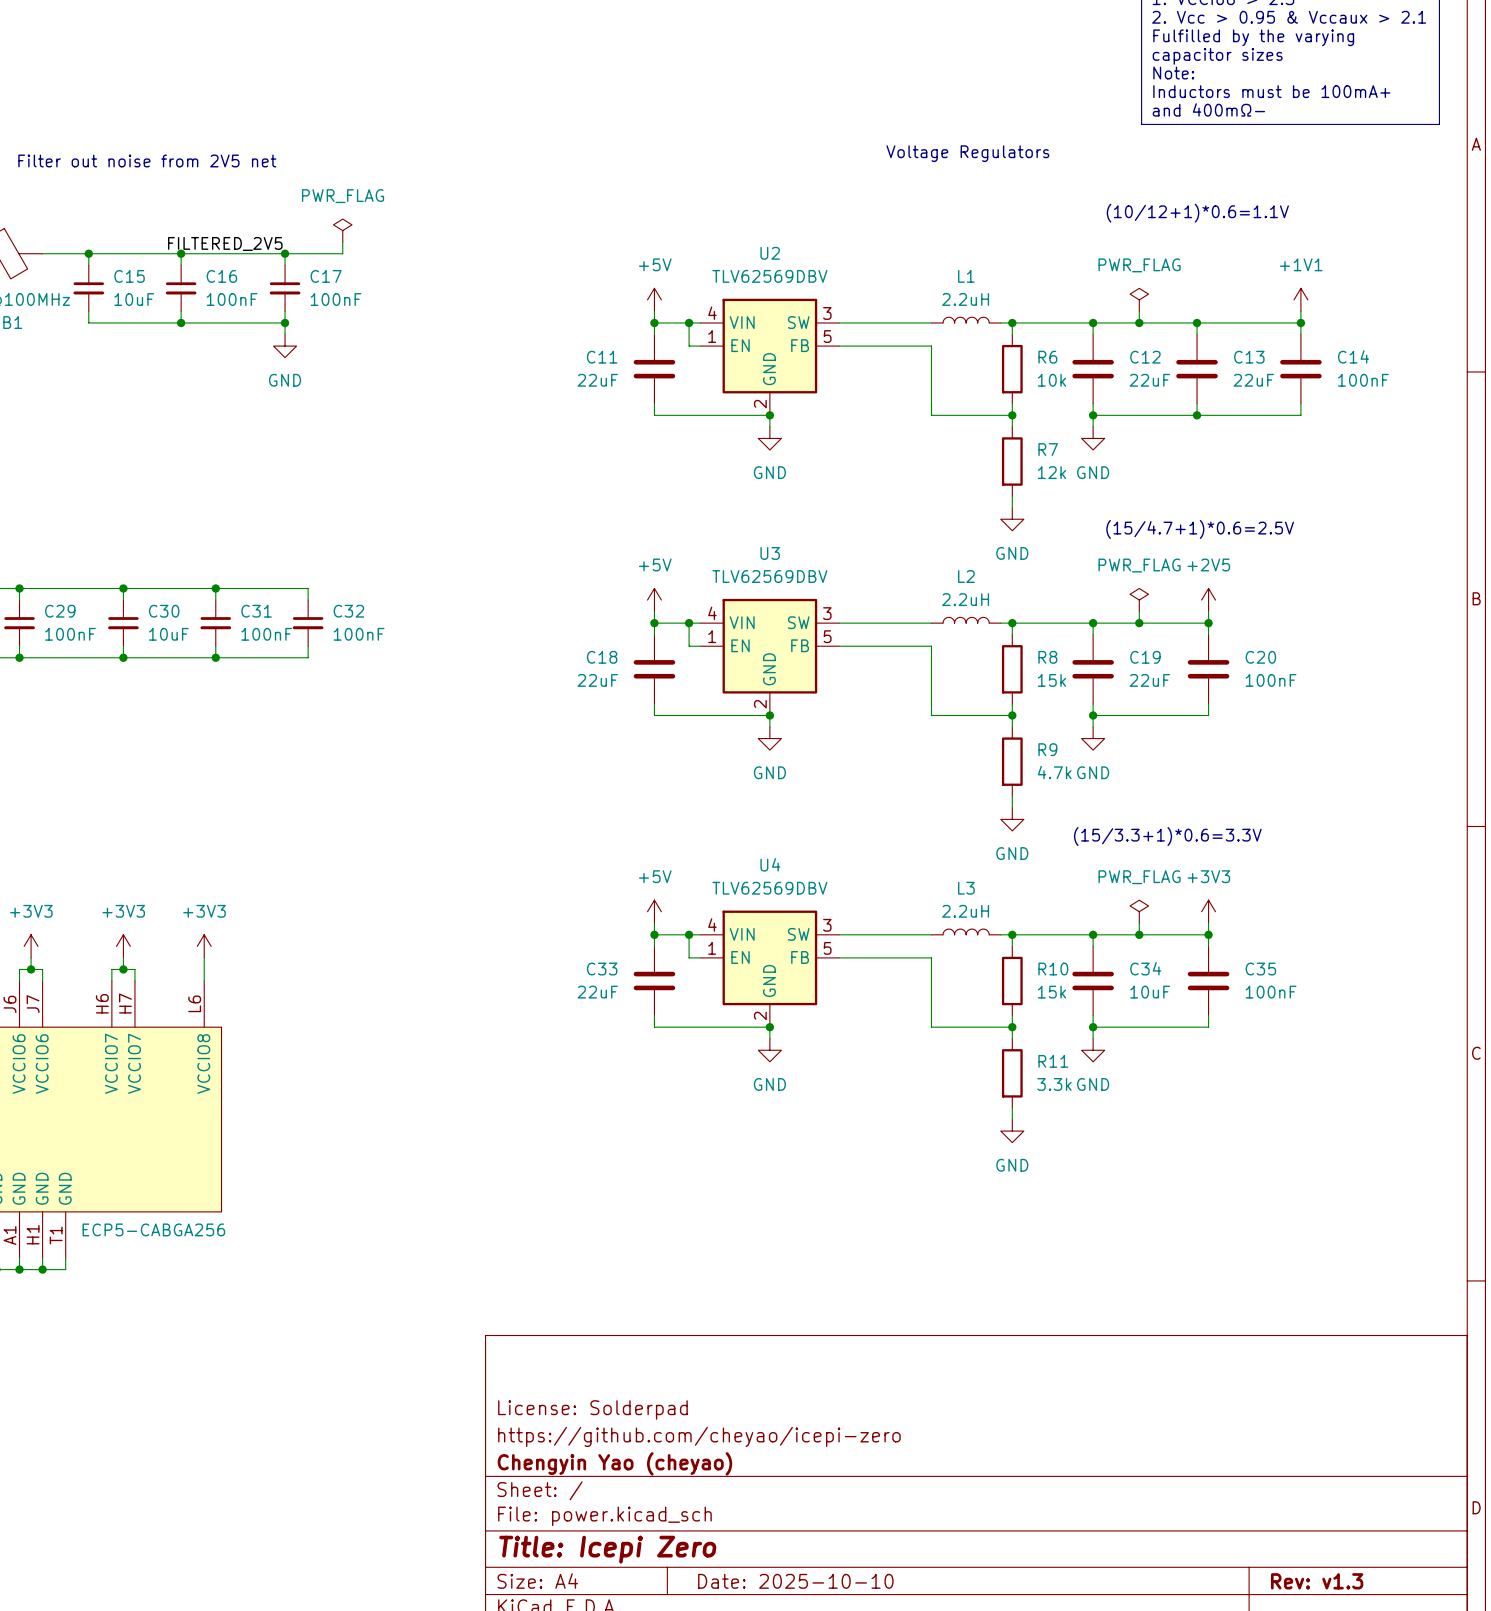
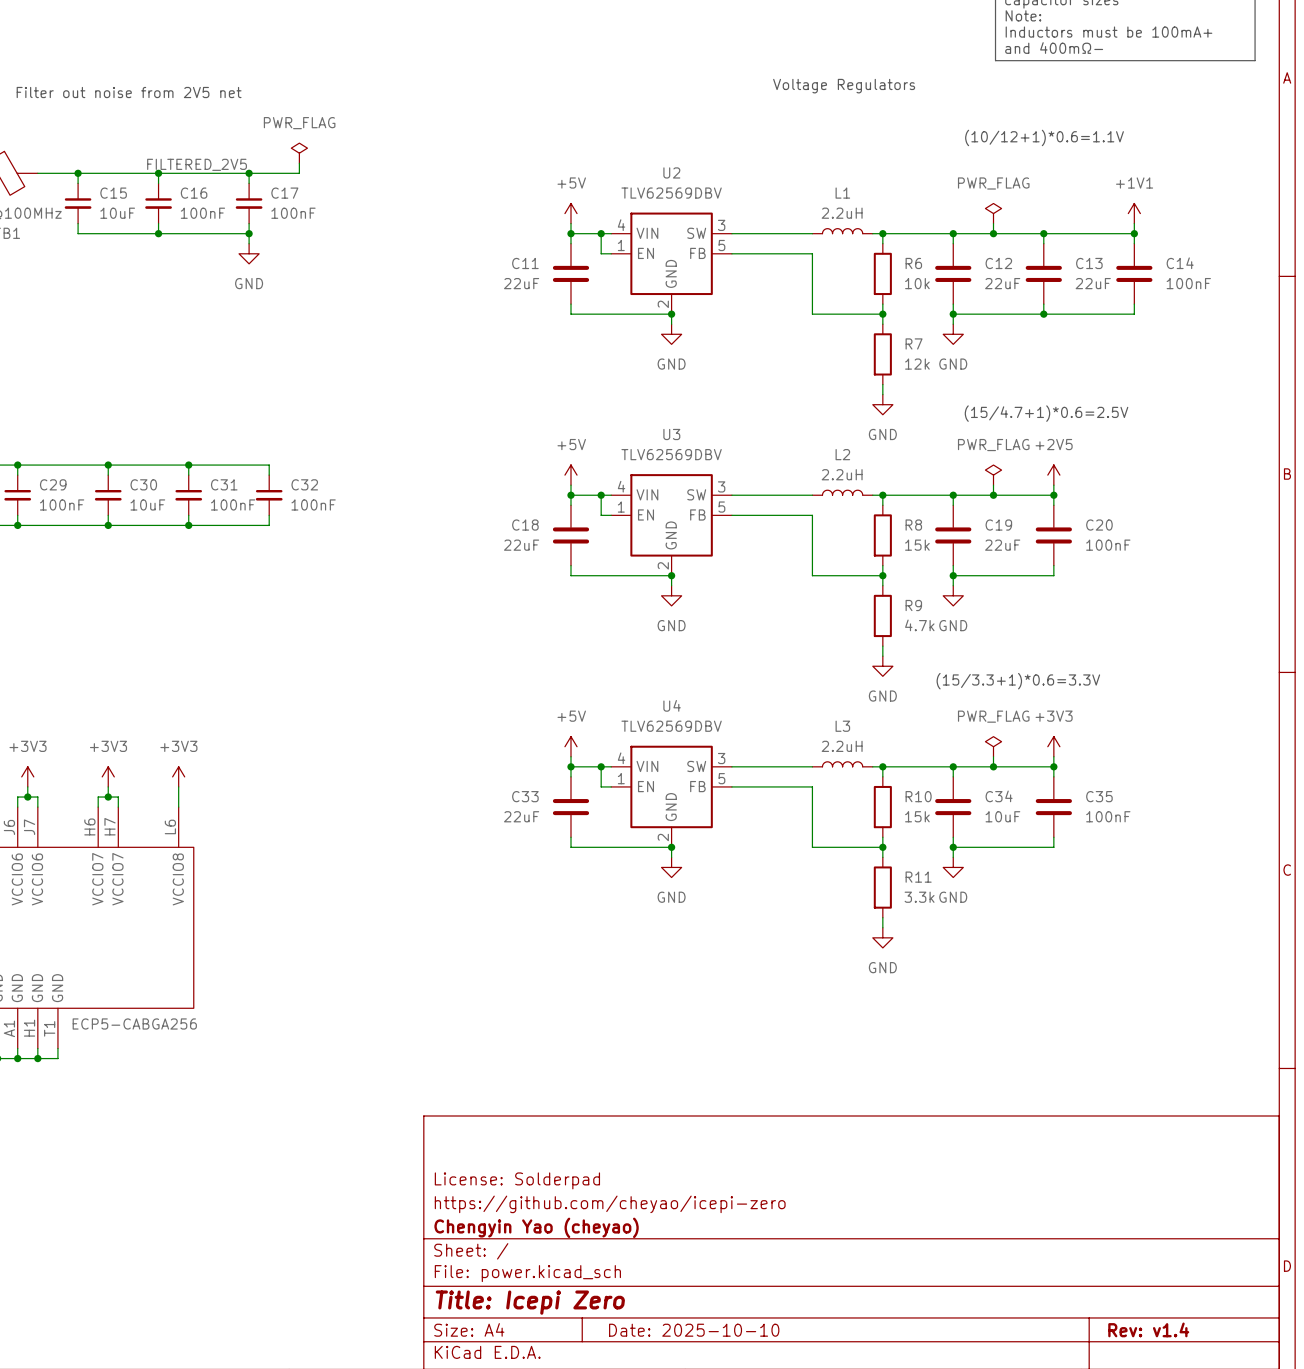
title block: Rev: v1.3 (1317, 1581) -> Rev: v1.4 (1148, 1329)

